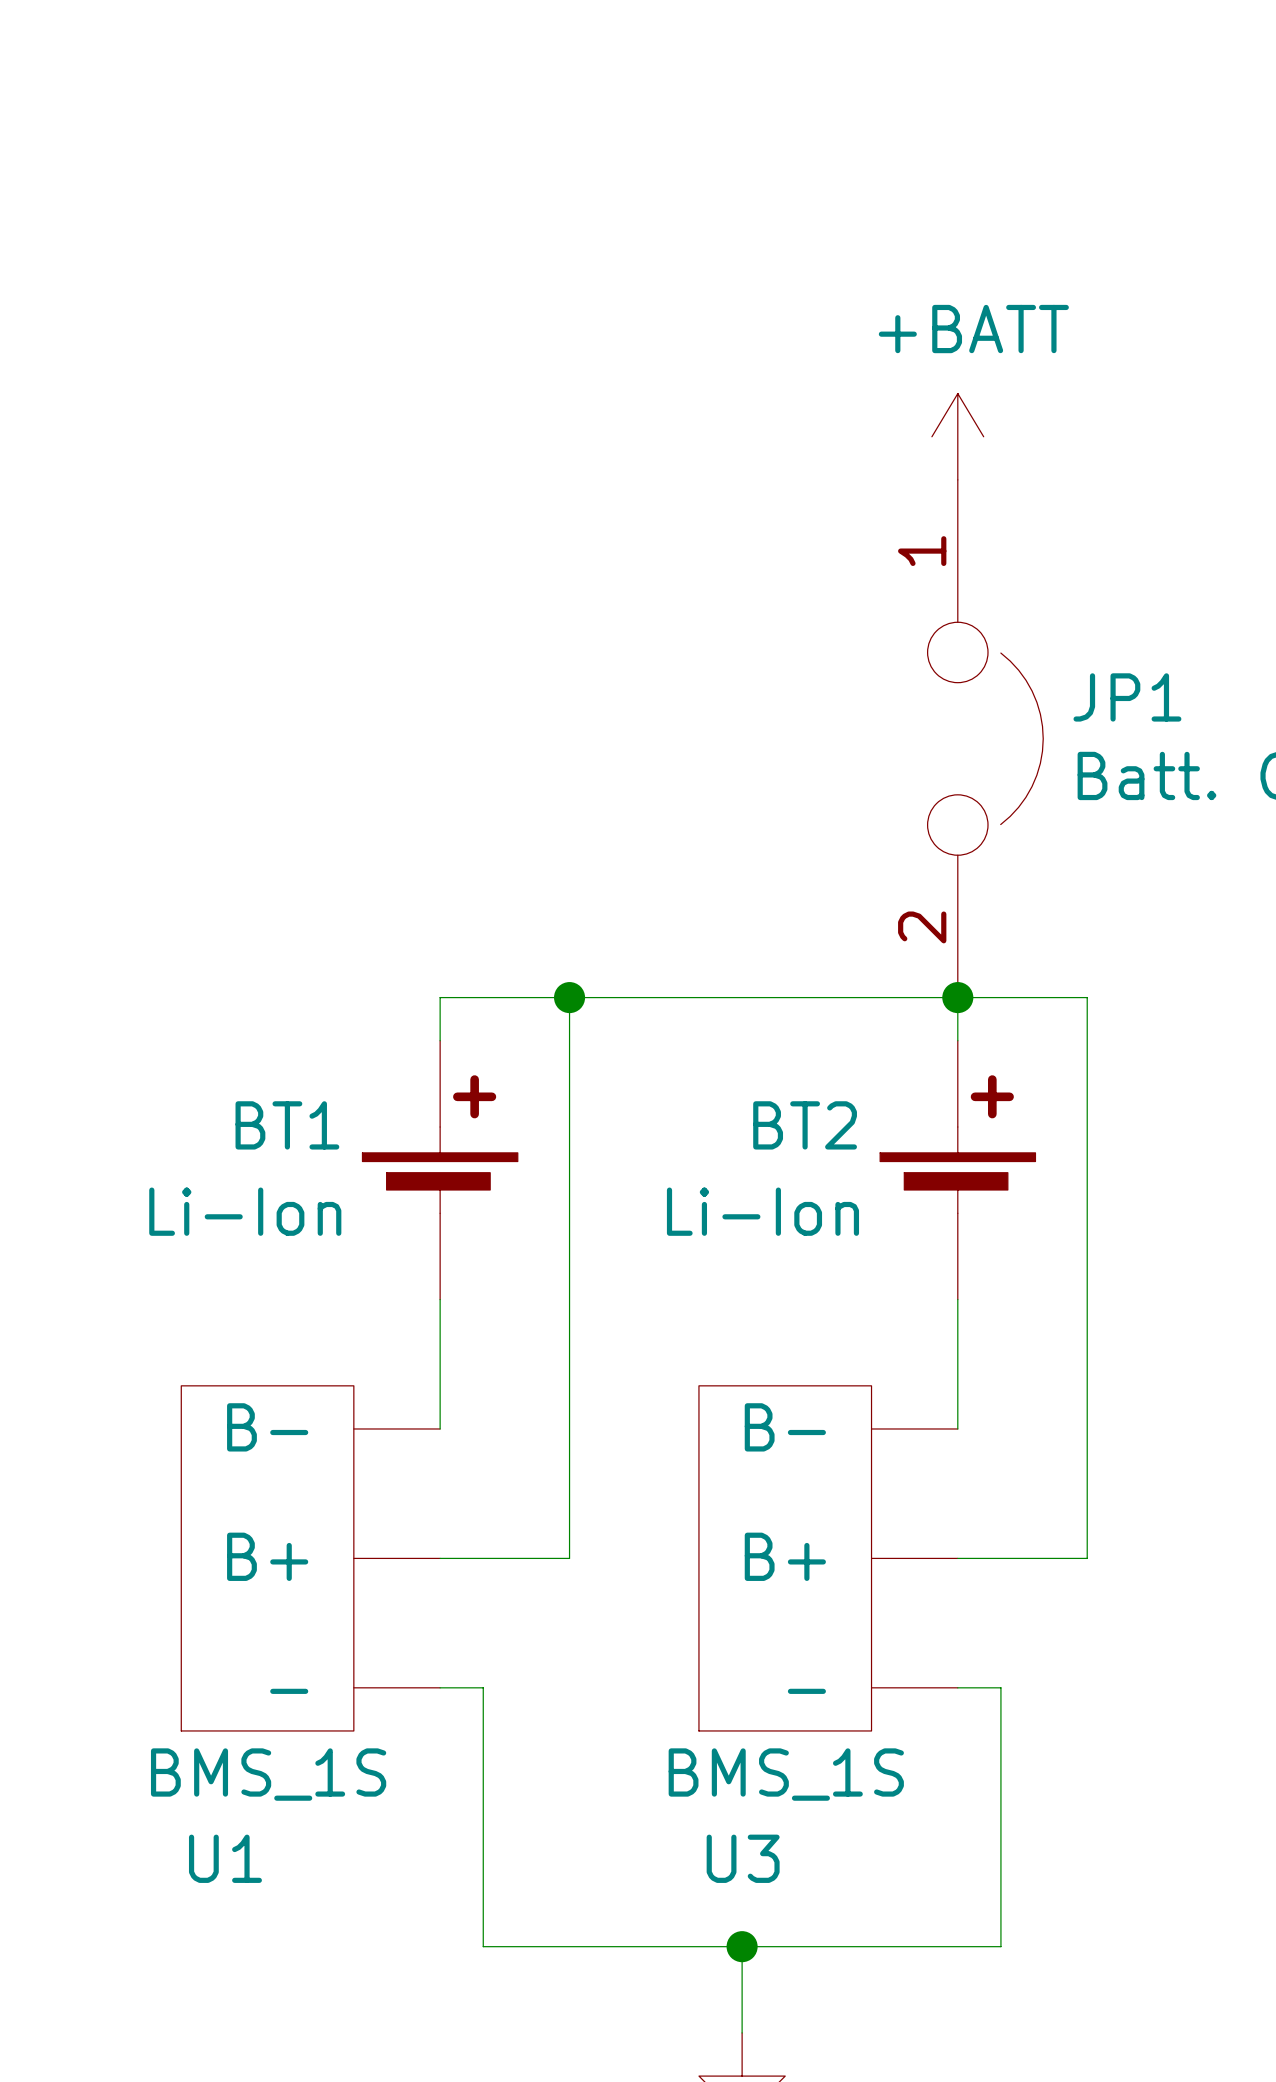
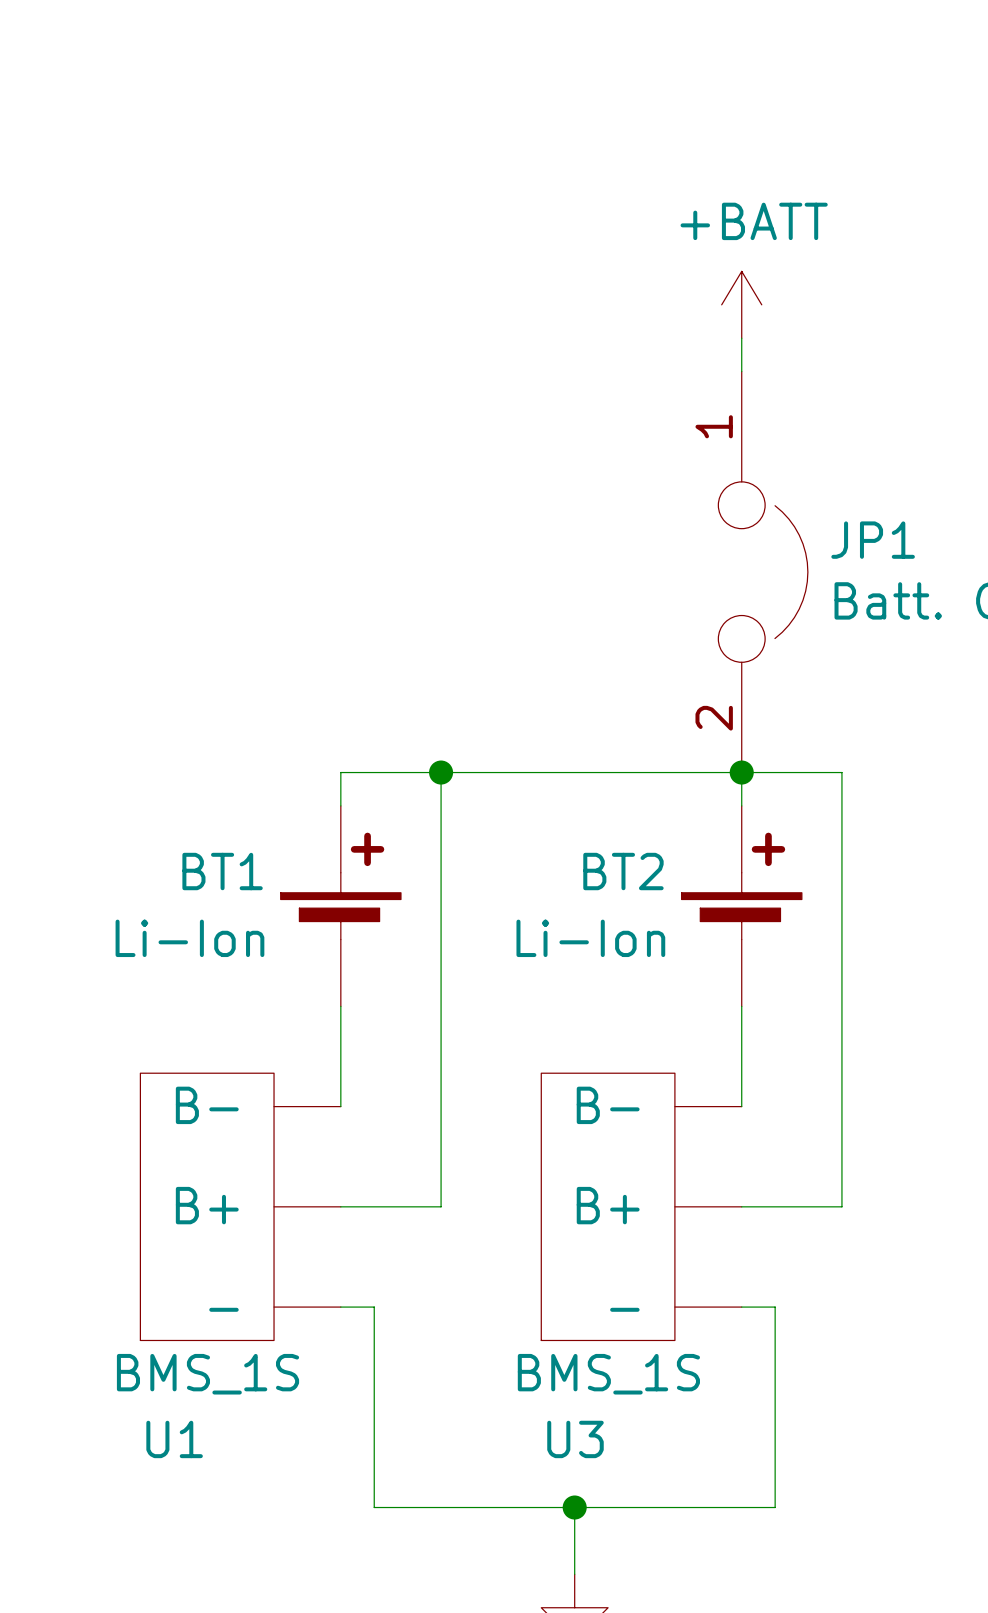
power symbol position: +BATT (957, 436) -> +BATT (741, 304)

